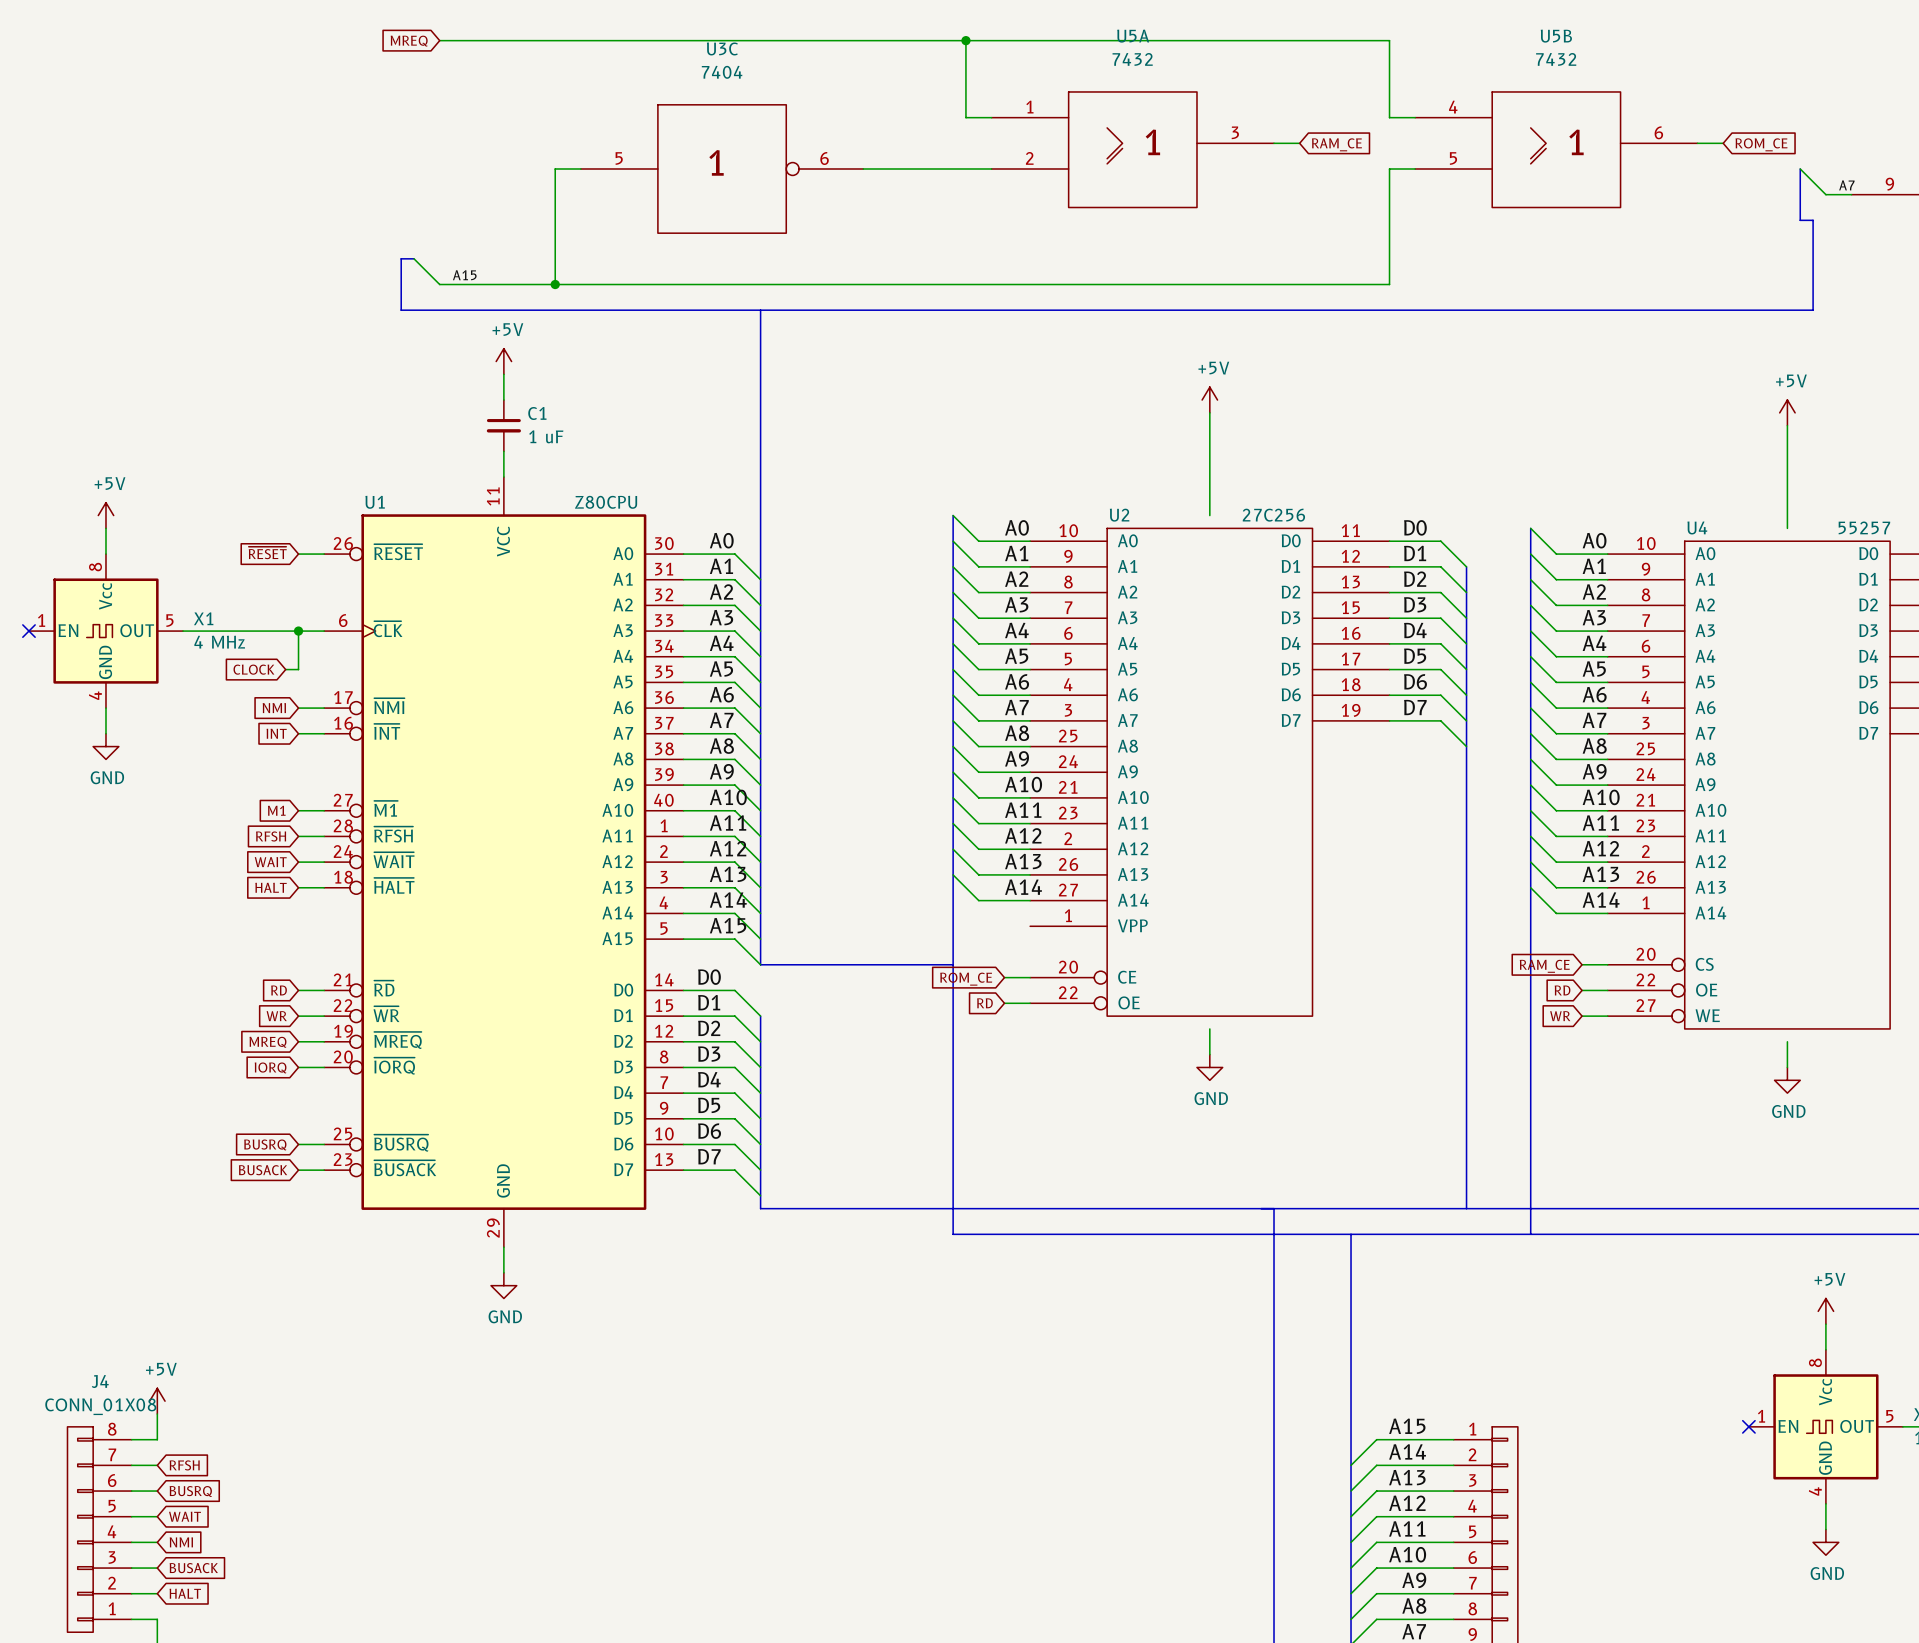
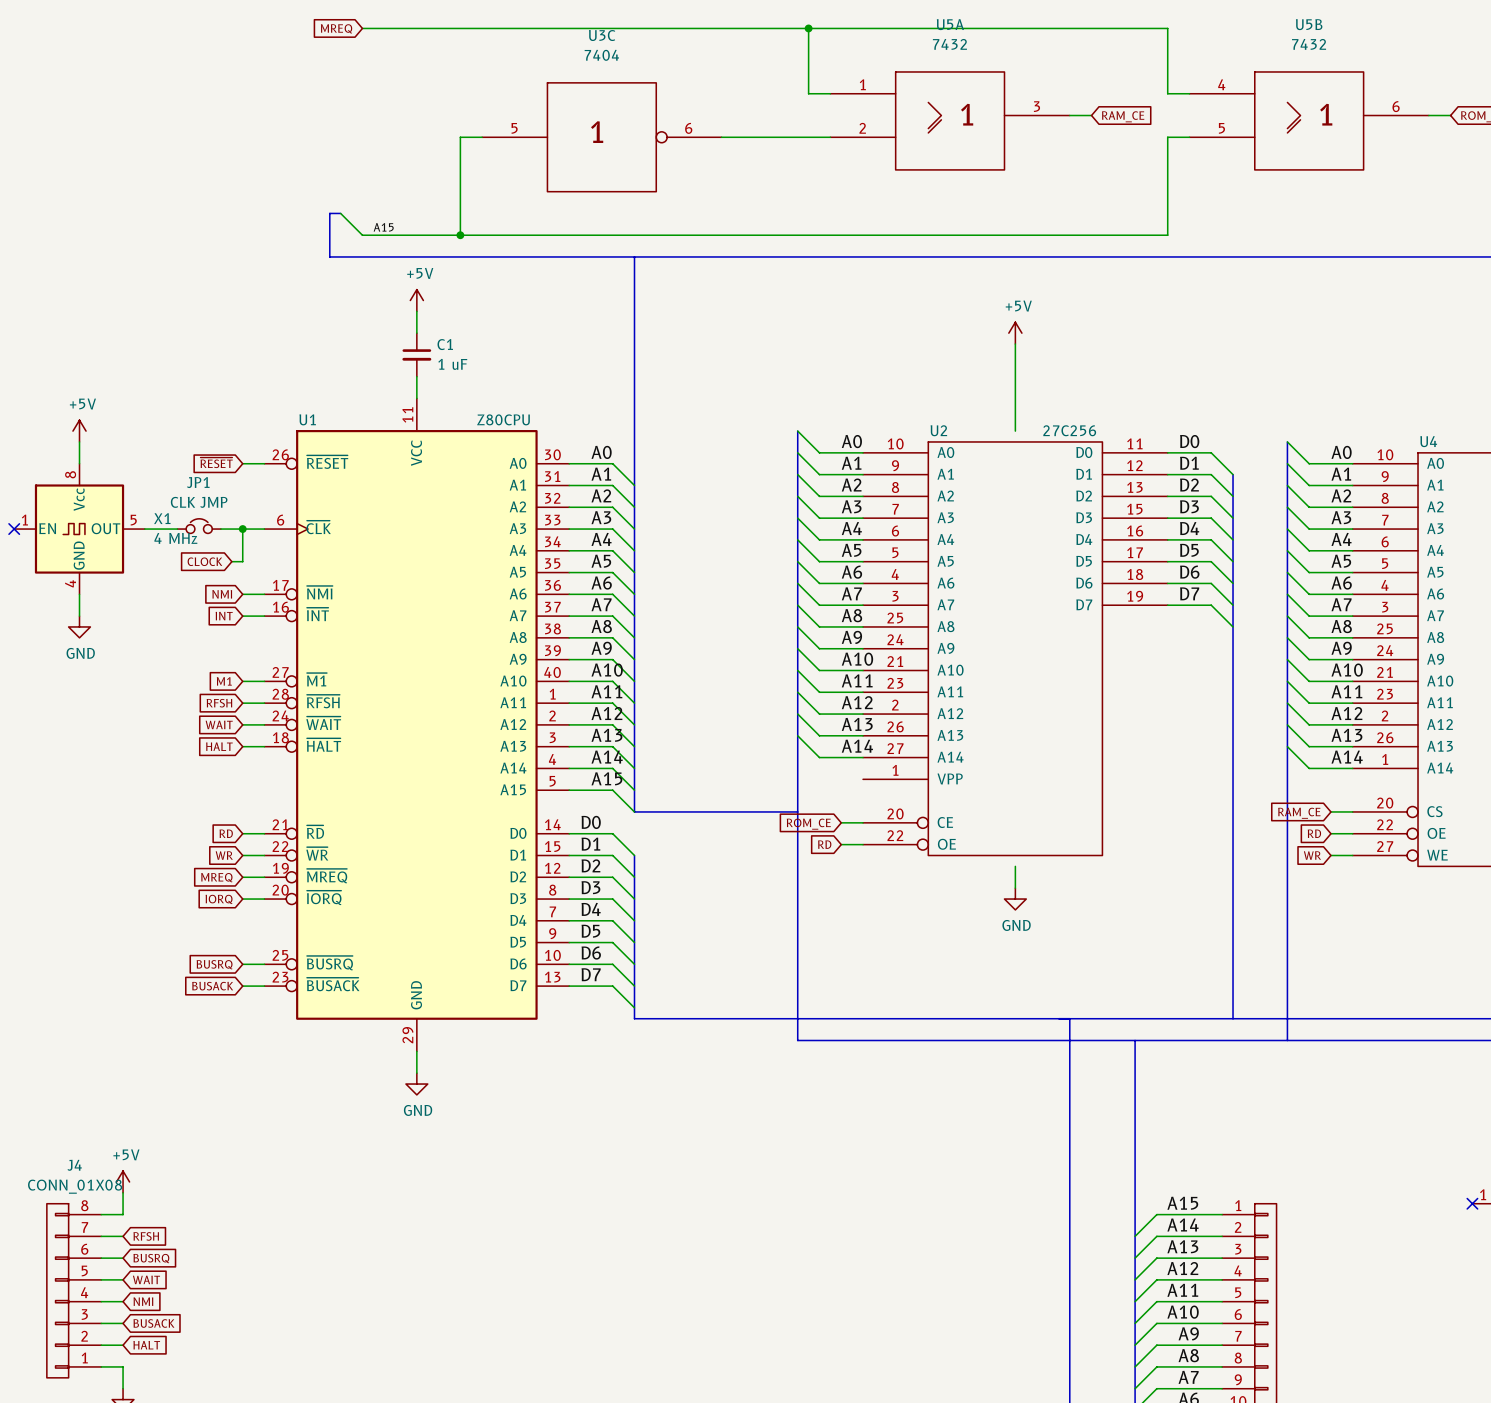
JP1: none -> CLK JMP (199, 526)
wire: (221, 631) (272, 631) -> none

